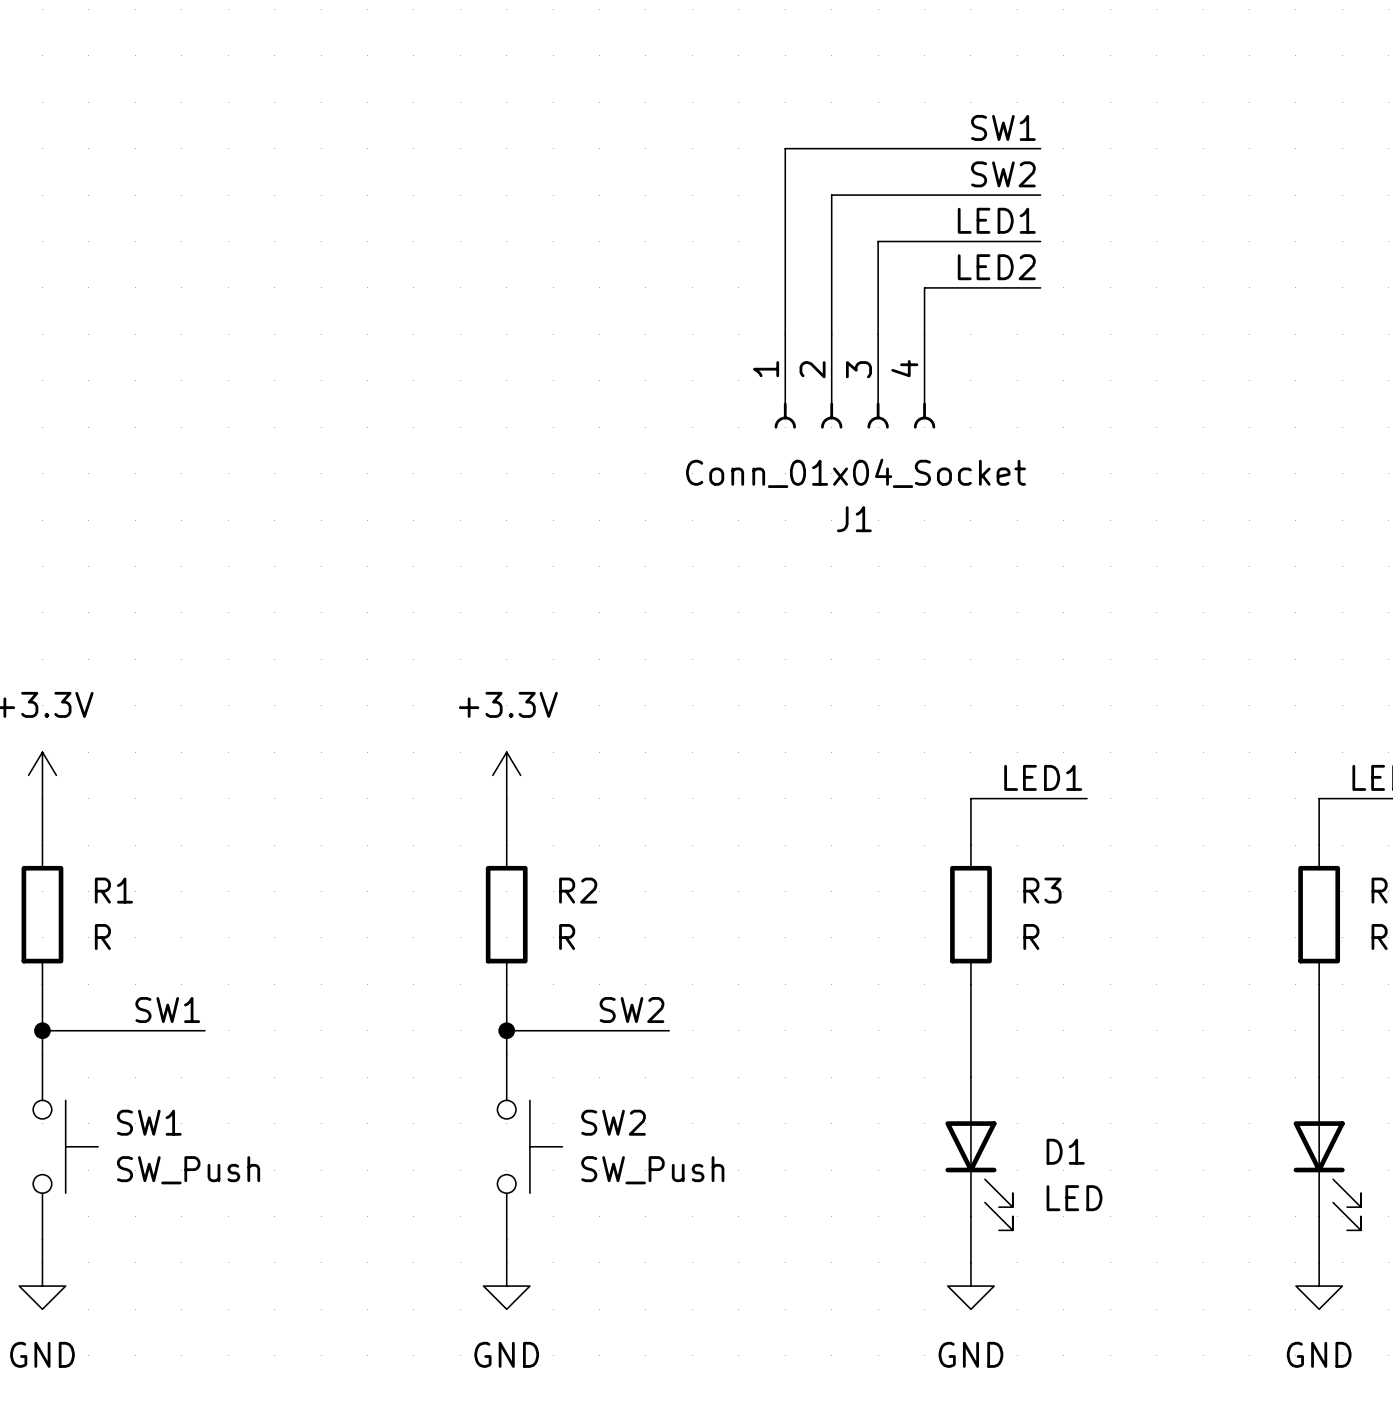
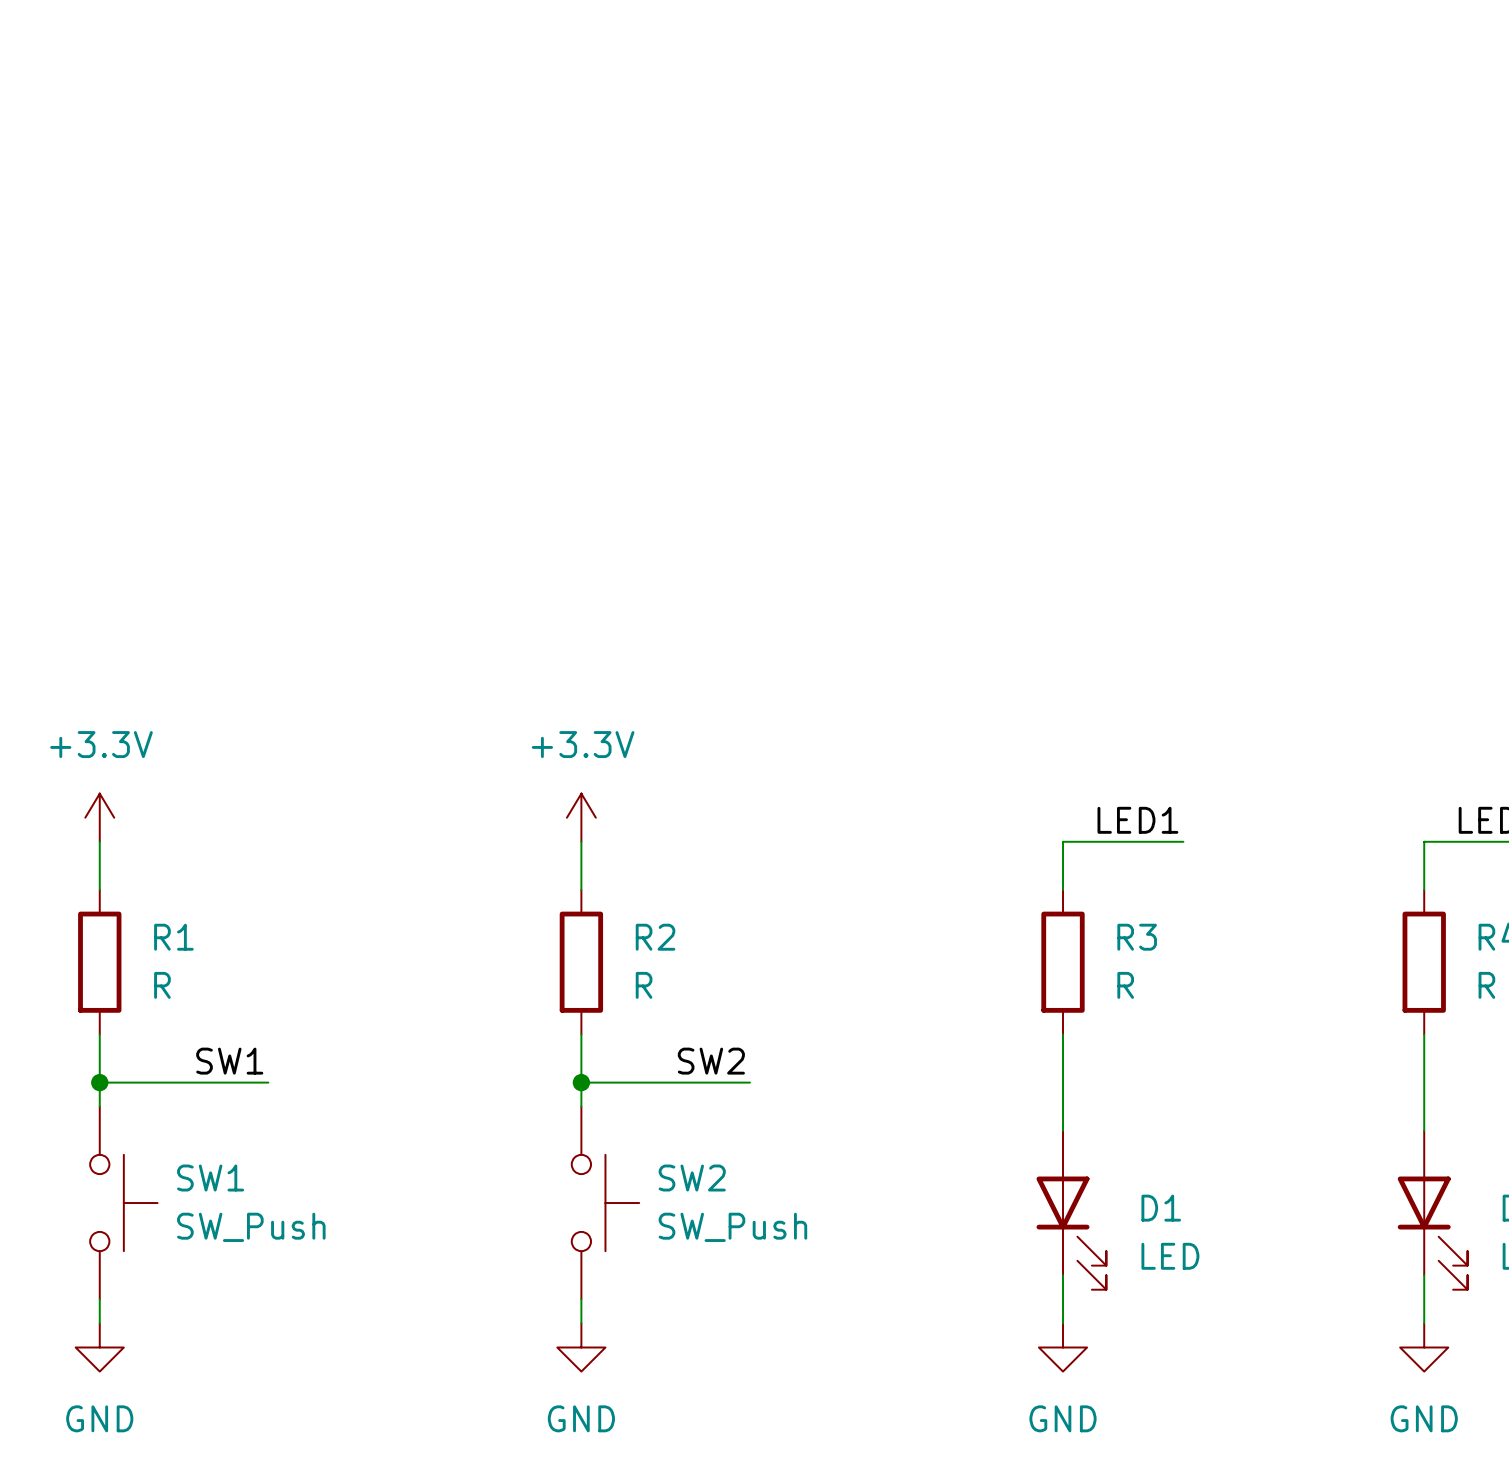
label: SW1 (1003, 127) -> none
wire: (1040, 148) (785, 148) (785, 334) -> none
label: SW2 (1003, 174) -> none
wire: (1040, 195) (831, 195) (831, 334) -> none
label: LED1 (996, 220) -> none
wire: (1040, 241) (878, 241) (878, 334) -> none
label: LED2 (996, 267) -> none
wire: (1040, 287) (924, 287) (924, 334) -> none
J1: Conn_01x04_Socket (854, 381) -> none

